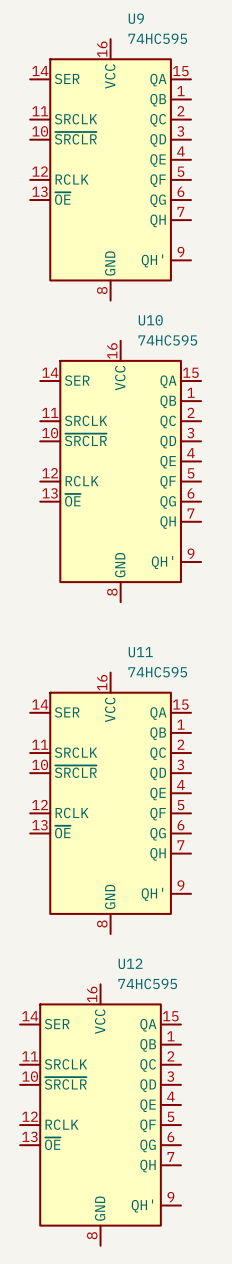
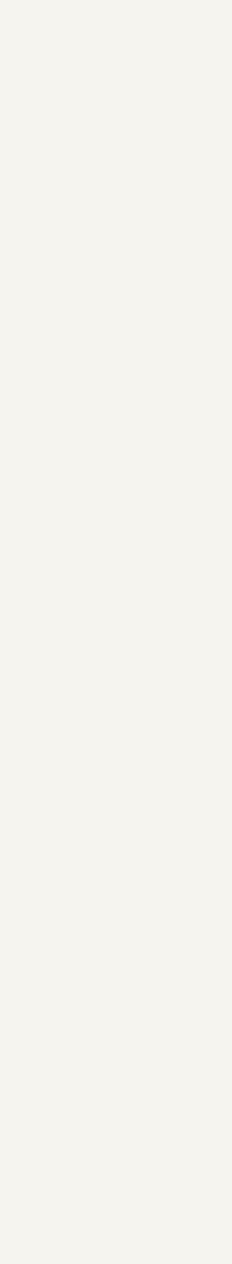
U9: 74HC595 (110, 169) -> none
U10: 74HC595 (120, 471) -> none
U11: 74HC595 (110, 803) -> none
U12: 74HC595 (100, 1115) -> none

